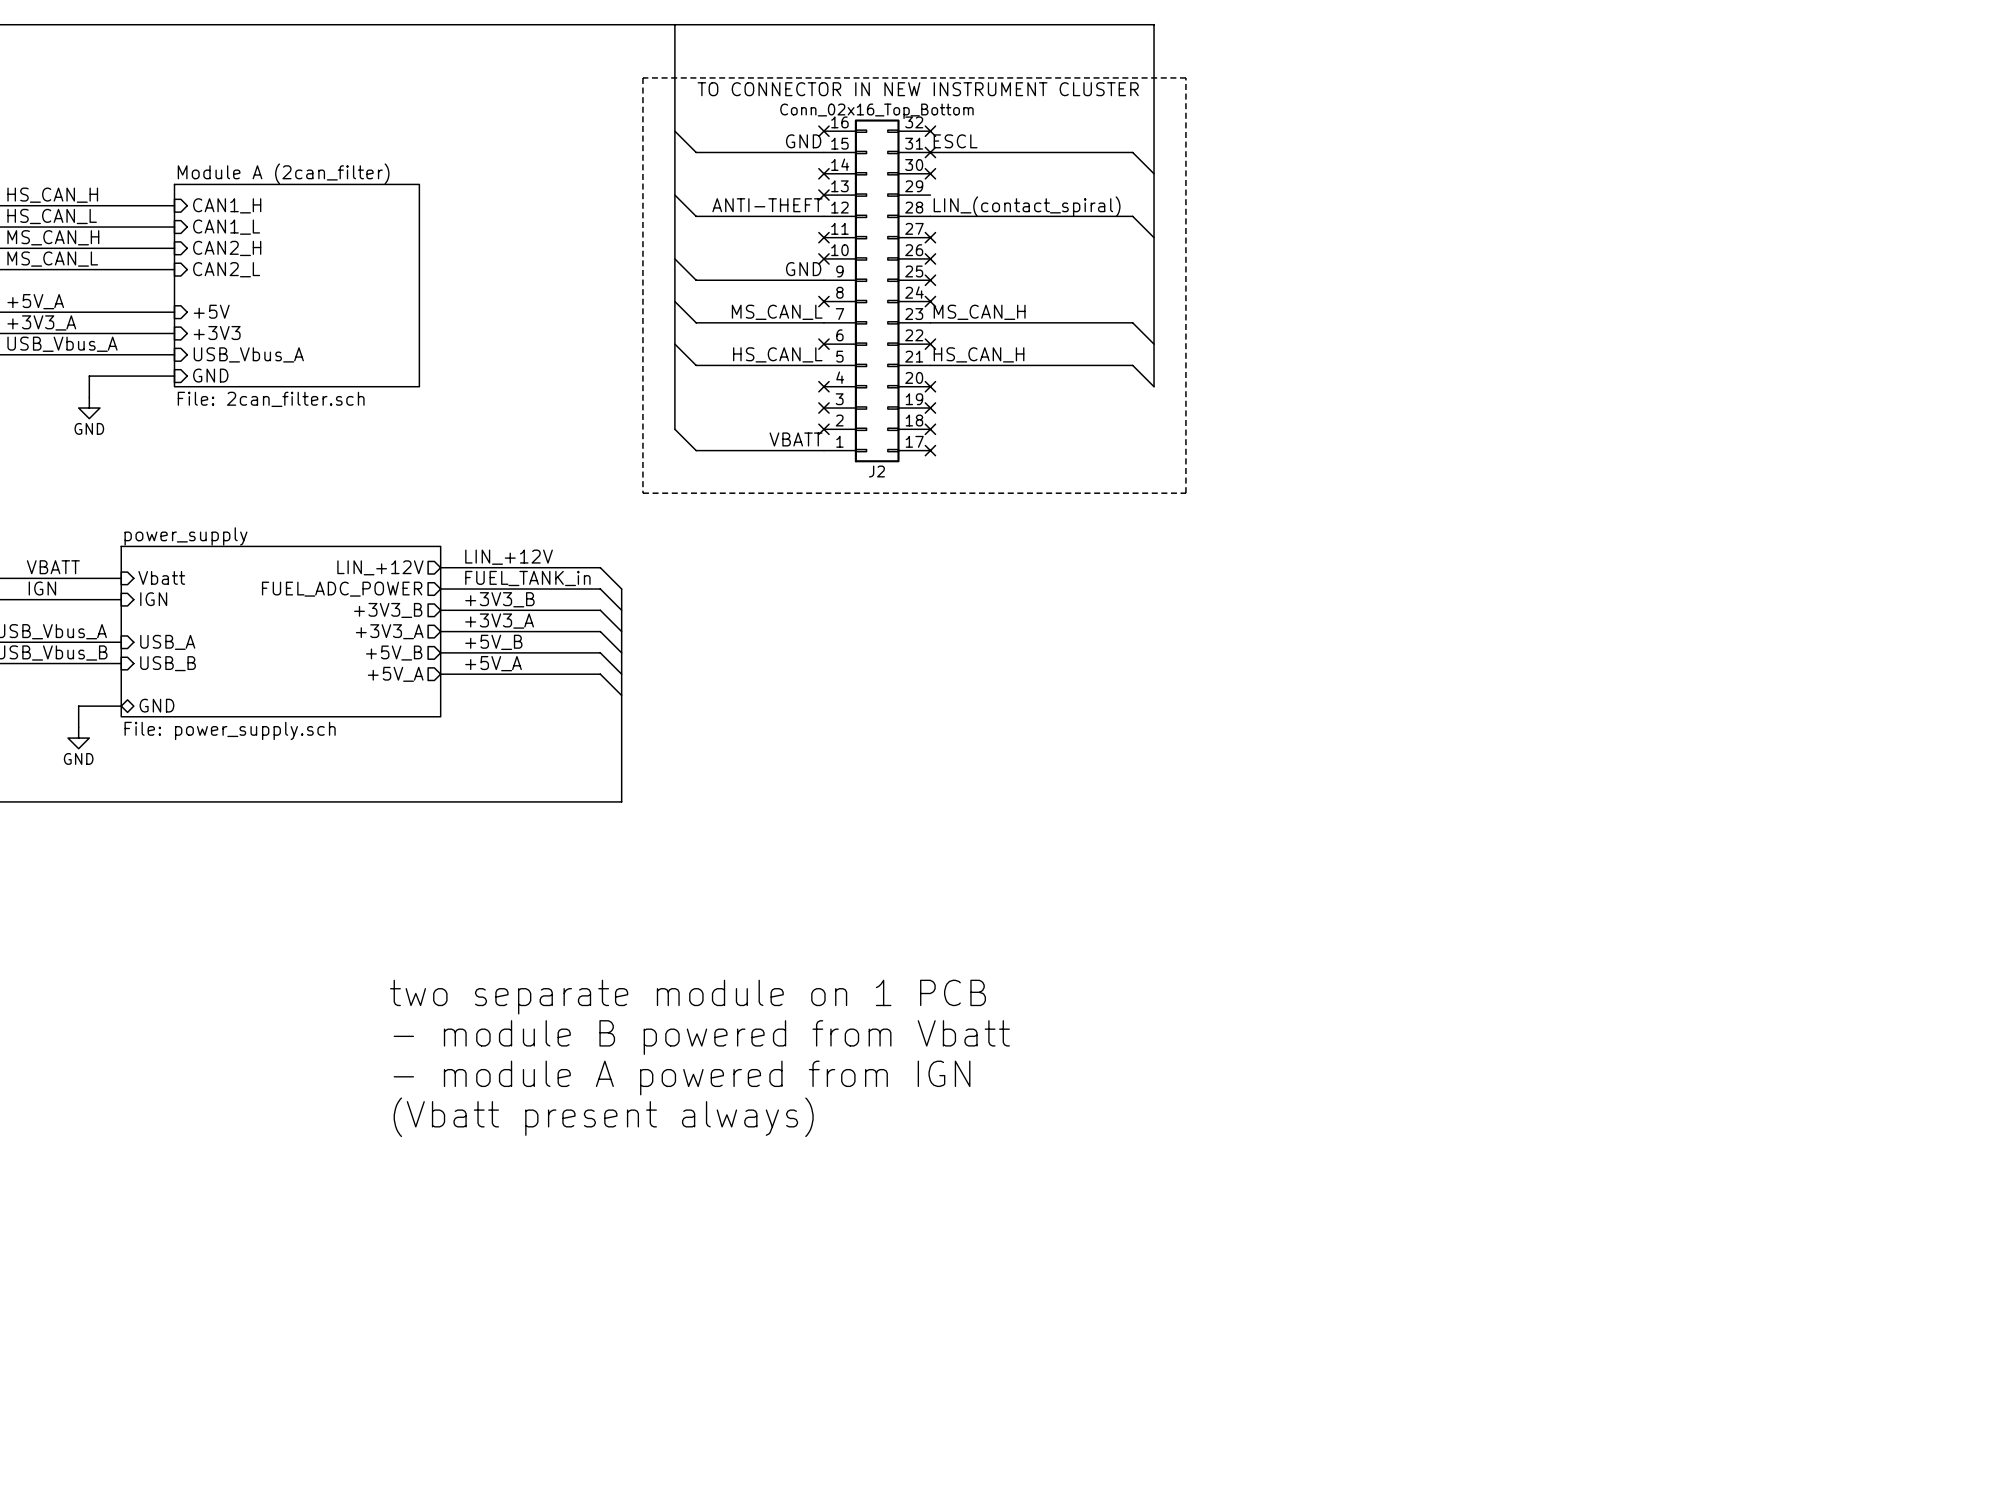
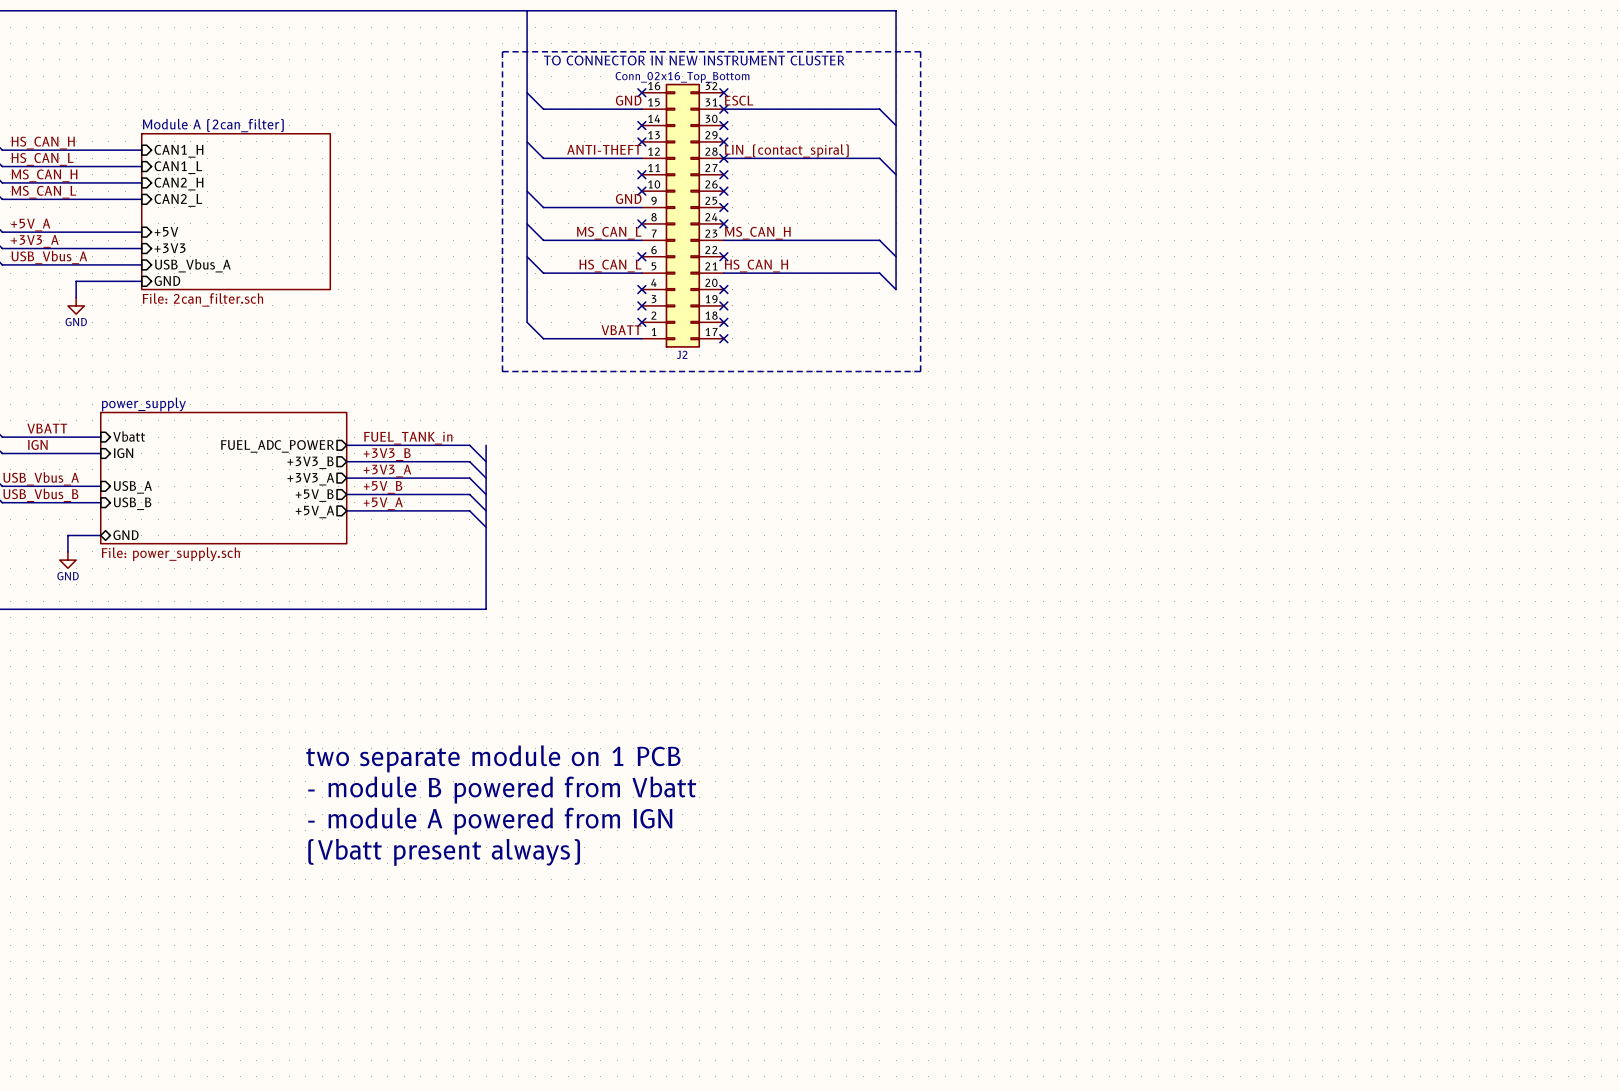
no-connect mark: none -> (723, 141)
no-connect mark: none -> (723, 158)
label: LIN_+12V (509, 557) -> none
sheet pin: LIN_+12V (380, 567) -> none
wire: (440, 567) (600, 567) (621, 589) -> none

